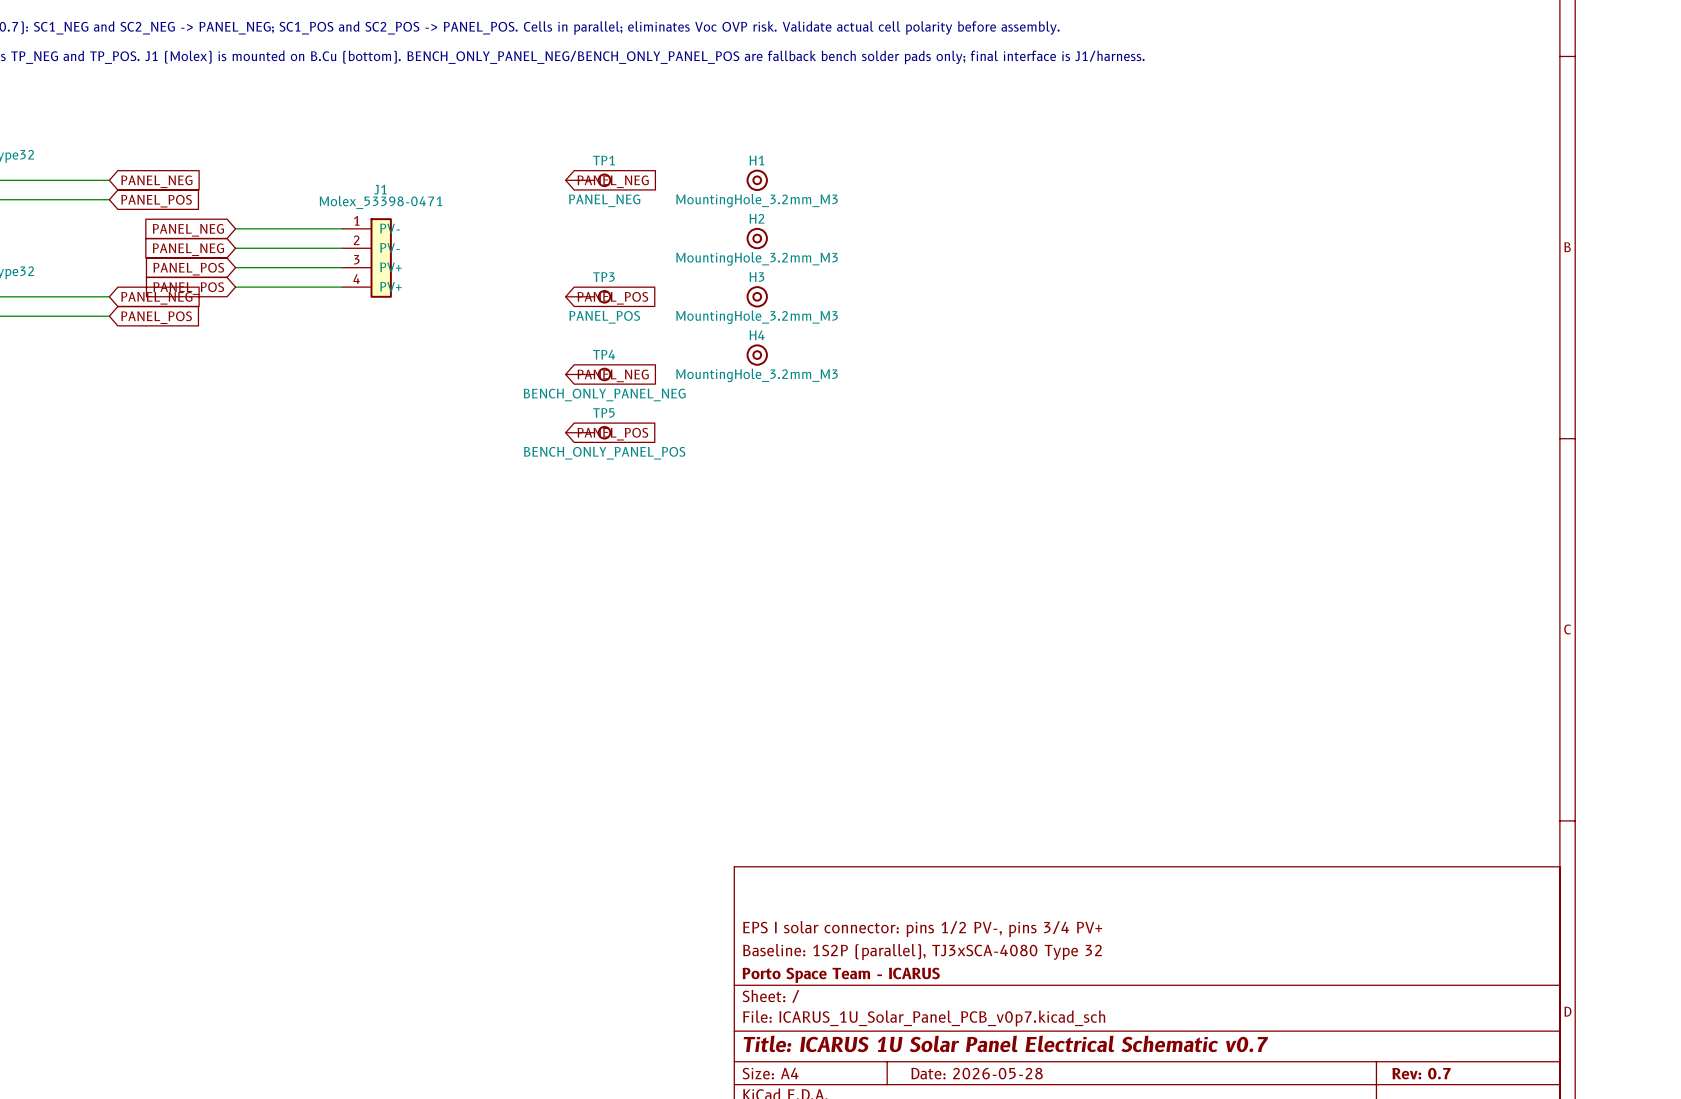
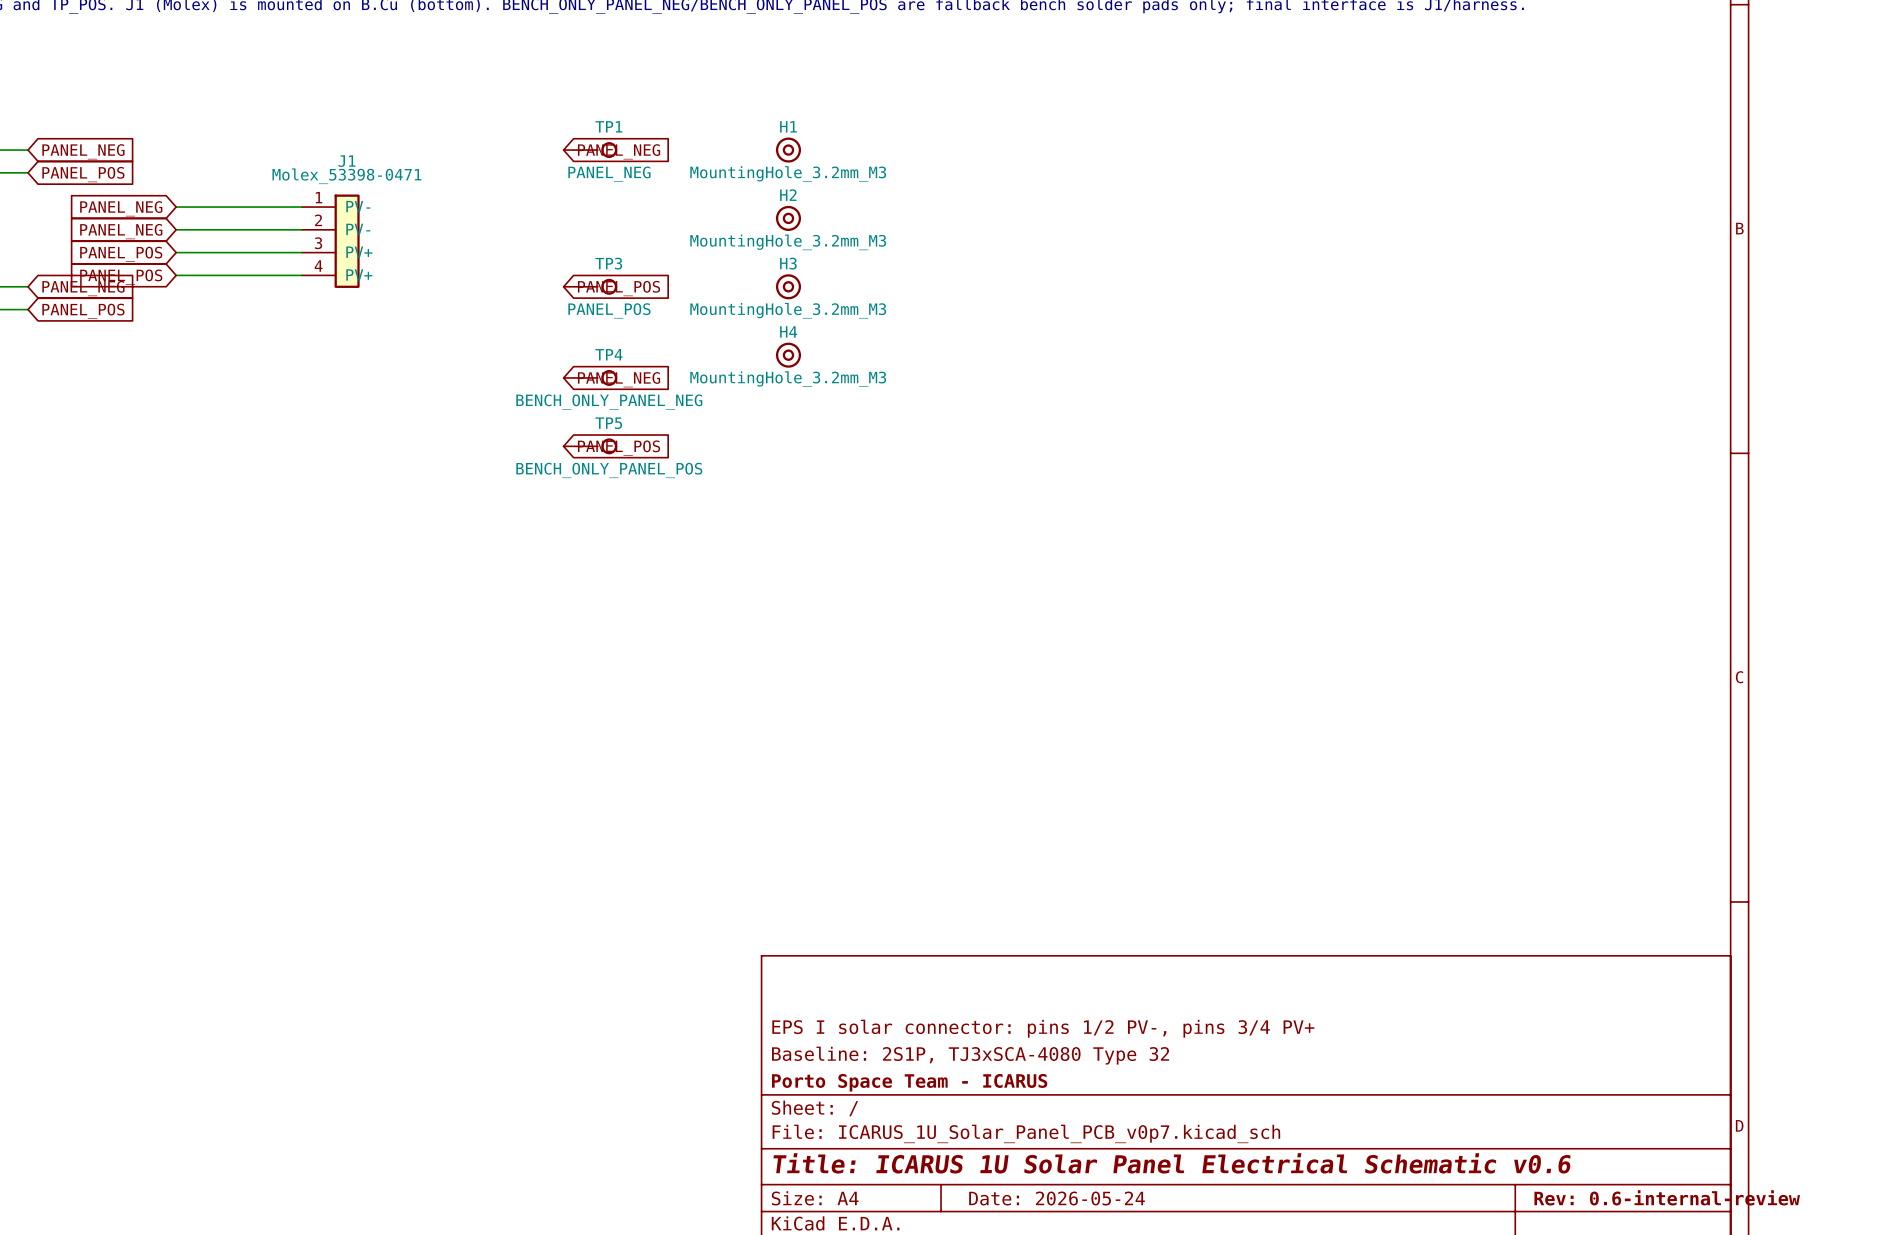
title block: Baseline: 1S2P (parallel), TJ3xSCA-4080 Type 32 (922, 951) -> Baseline: 2S1P, TJ3xSCA-4080 Type 32 (970, 1055)
title block: Title: ICARUS 1U Solar Panel Electrical Schematic v0.7 (1005, 1043) -> Title: ICARUS 1U Solar Panel Electrical Schematic v0.6 (1172, 1163)
title block: Date: 2026-05-28 (977, 1073) -> Date: 2026-05-24 (1057, 1198)
title block: Rev: 0.7 (1421, 1073) -> Rev: 0.6-internal-review (1667, 1197)

